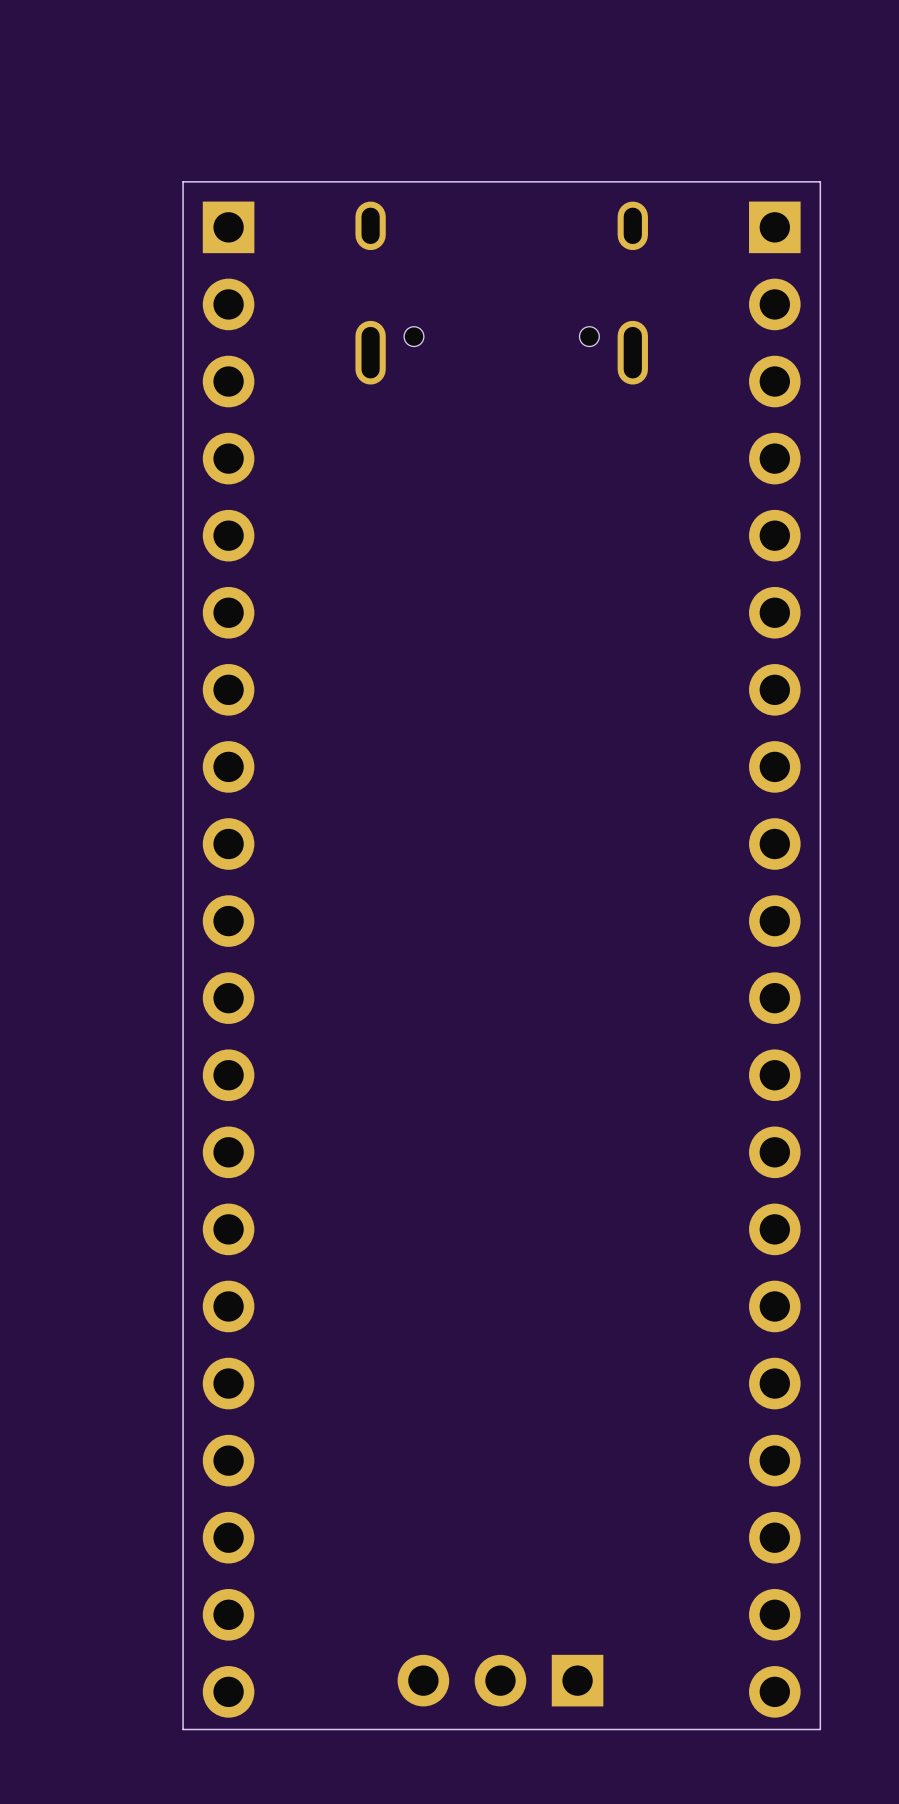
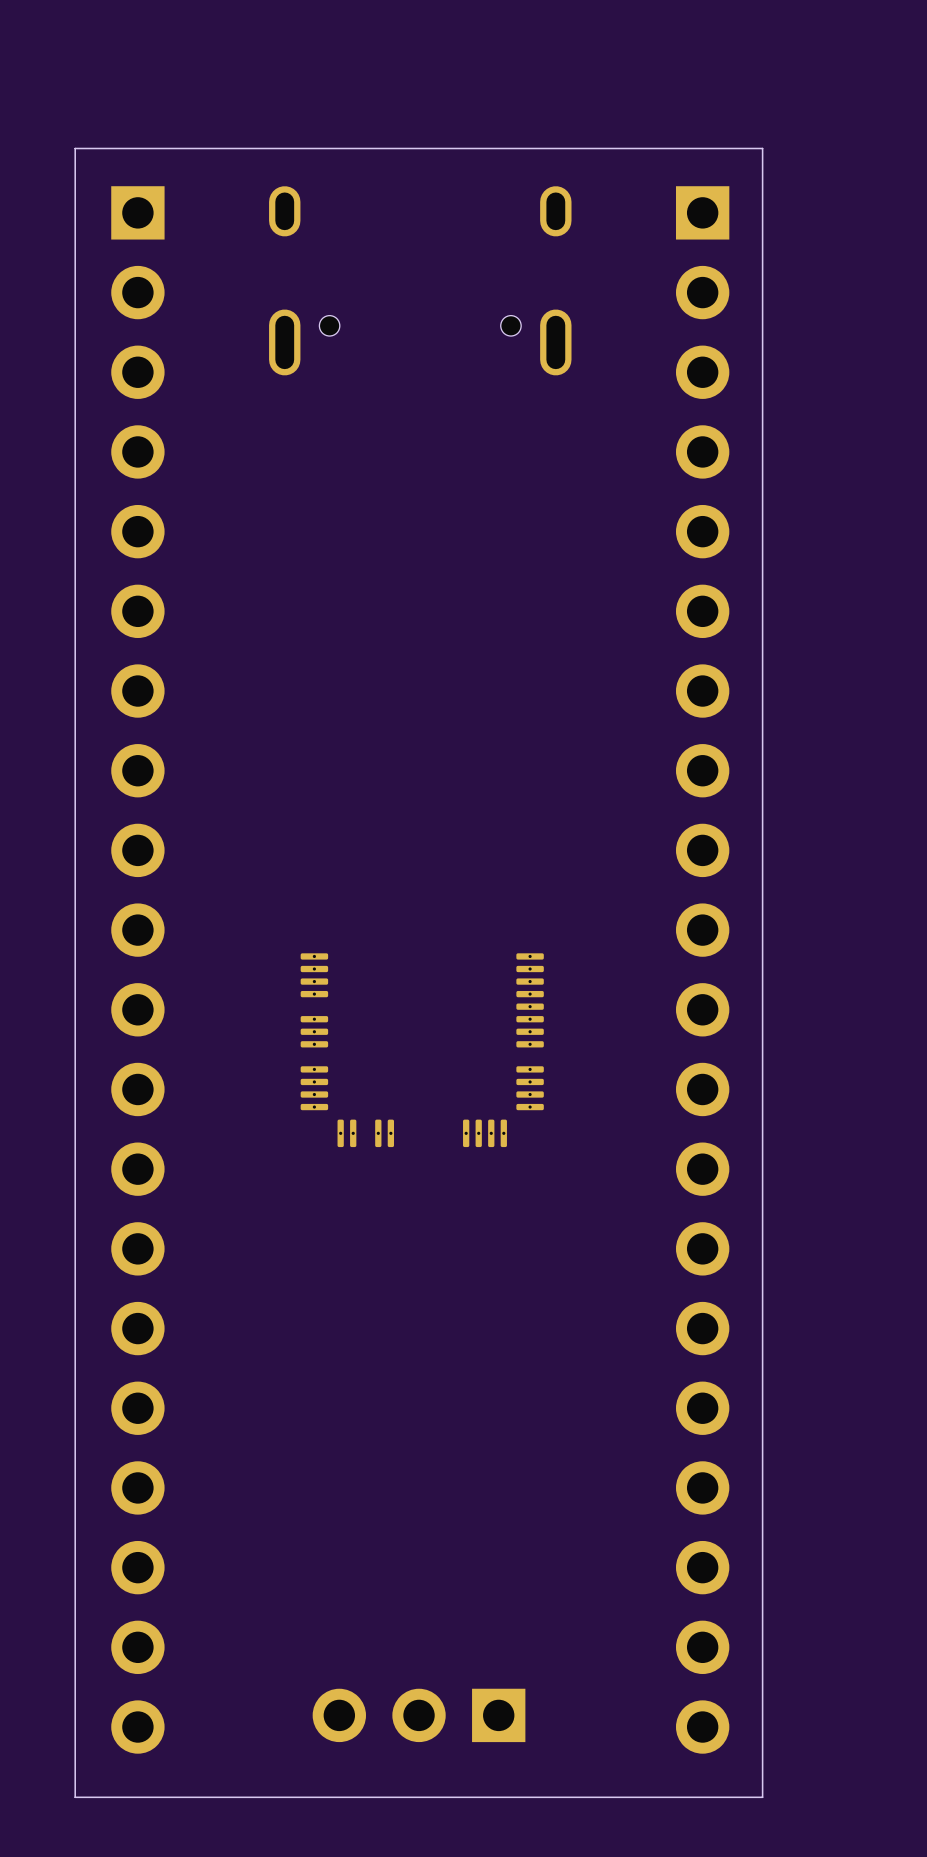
board edge: (820, 181) (183, 181) (183, 1729) (820, 1729) (820, 181) -> (762, 148) (762, 1797) (75, 1797) (75, 148) (762, 148)
part: none -> (422, 1050)

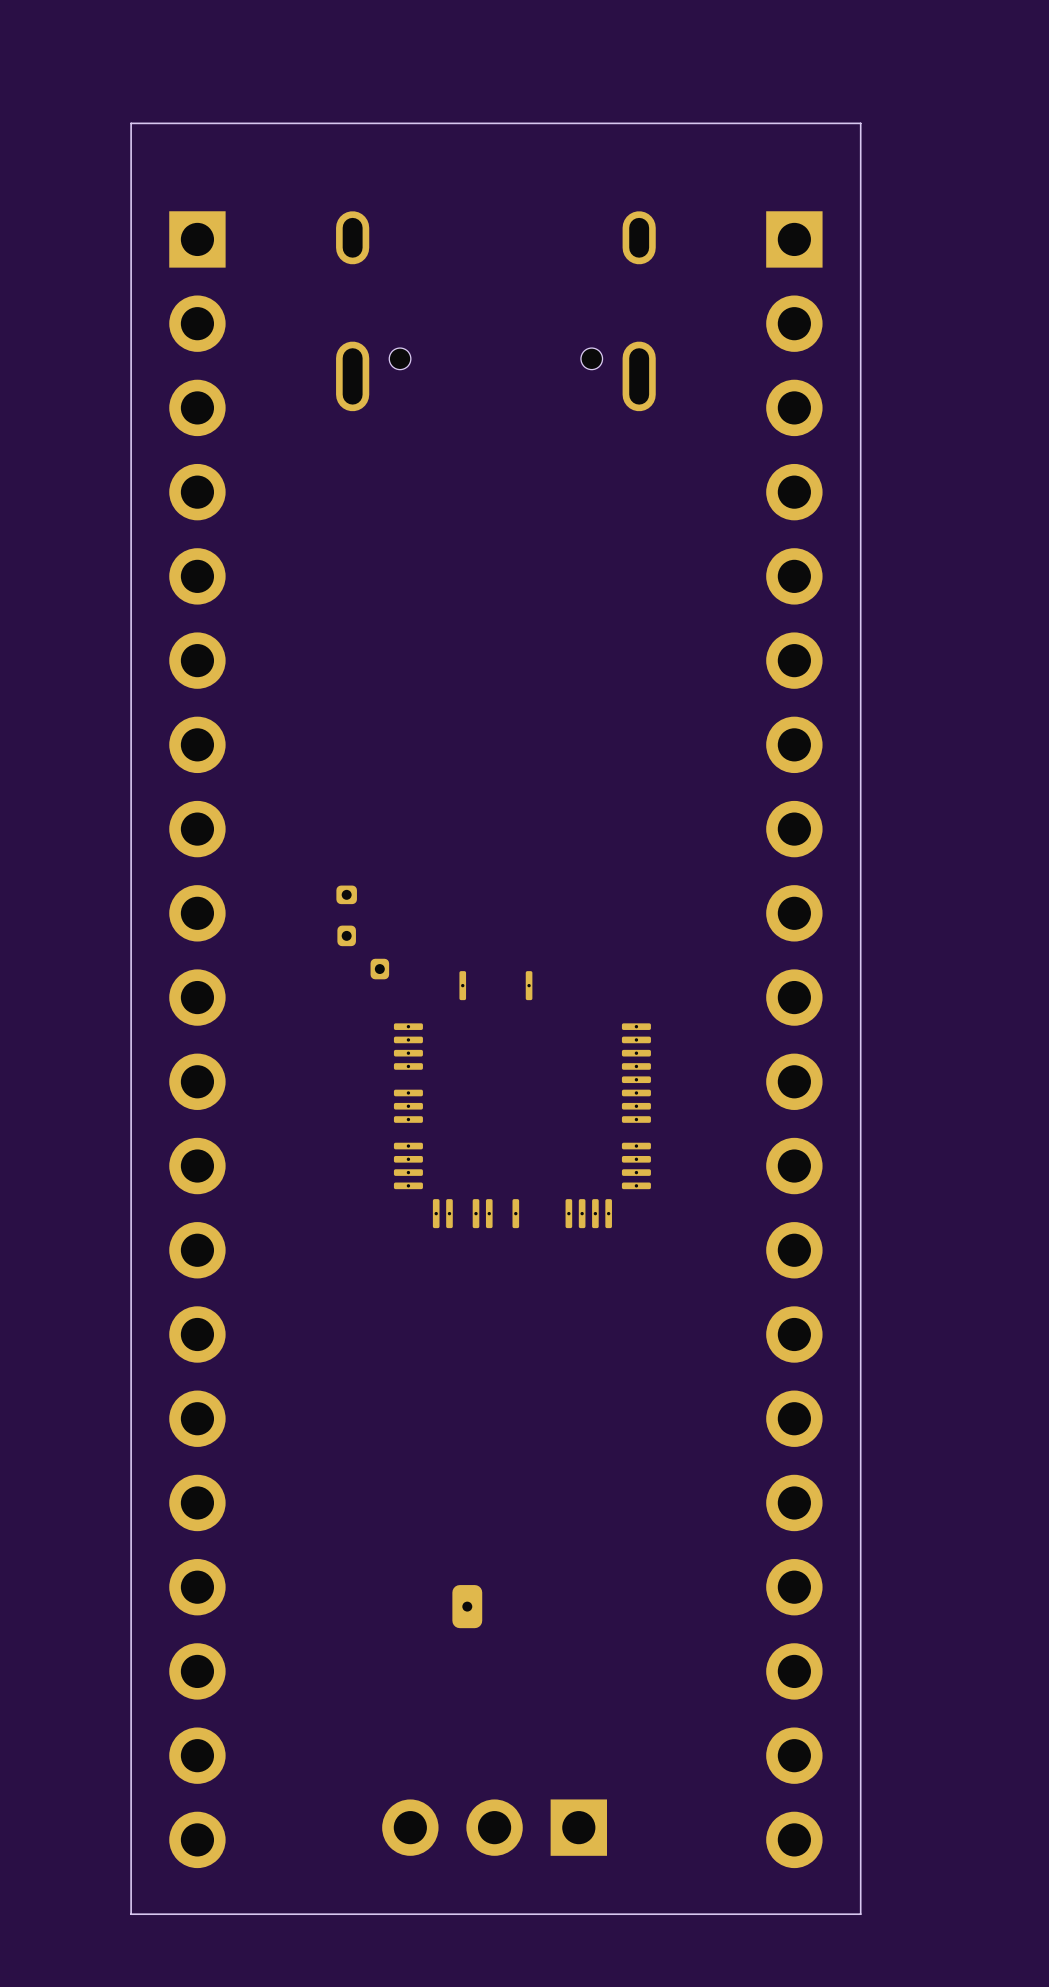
board edge: (75, 148) (762, 148) (762, 1797) -> (131, 171) (131, 123) (860, 123) (860, 1914) (857, 1914)
part: none -> (346, 894)
part: none -> (346, 935)
part: none -> (379, 969)
part: none -> (522, 1099)
part: (422, 1050) -> none
part: none -> (467, 1606)

